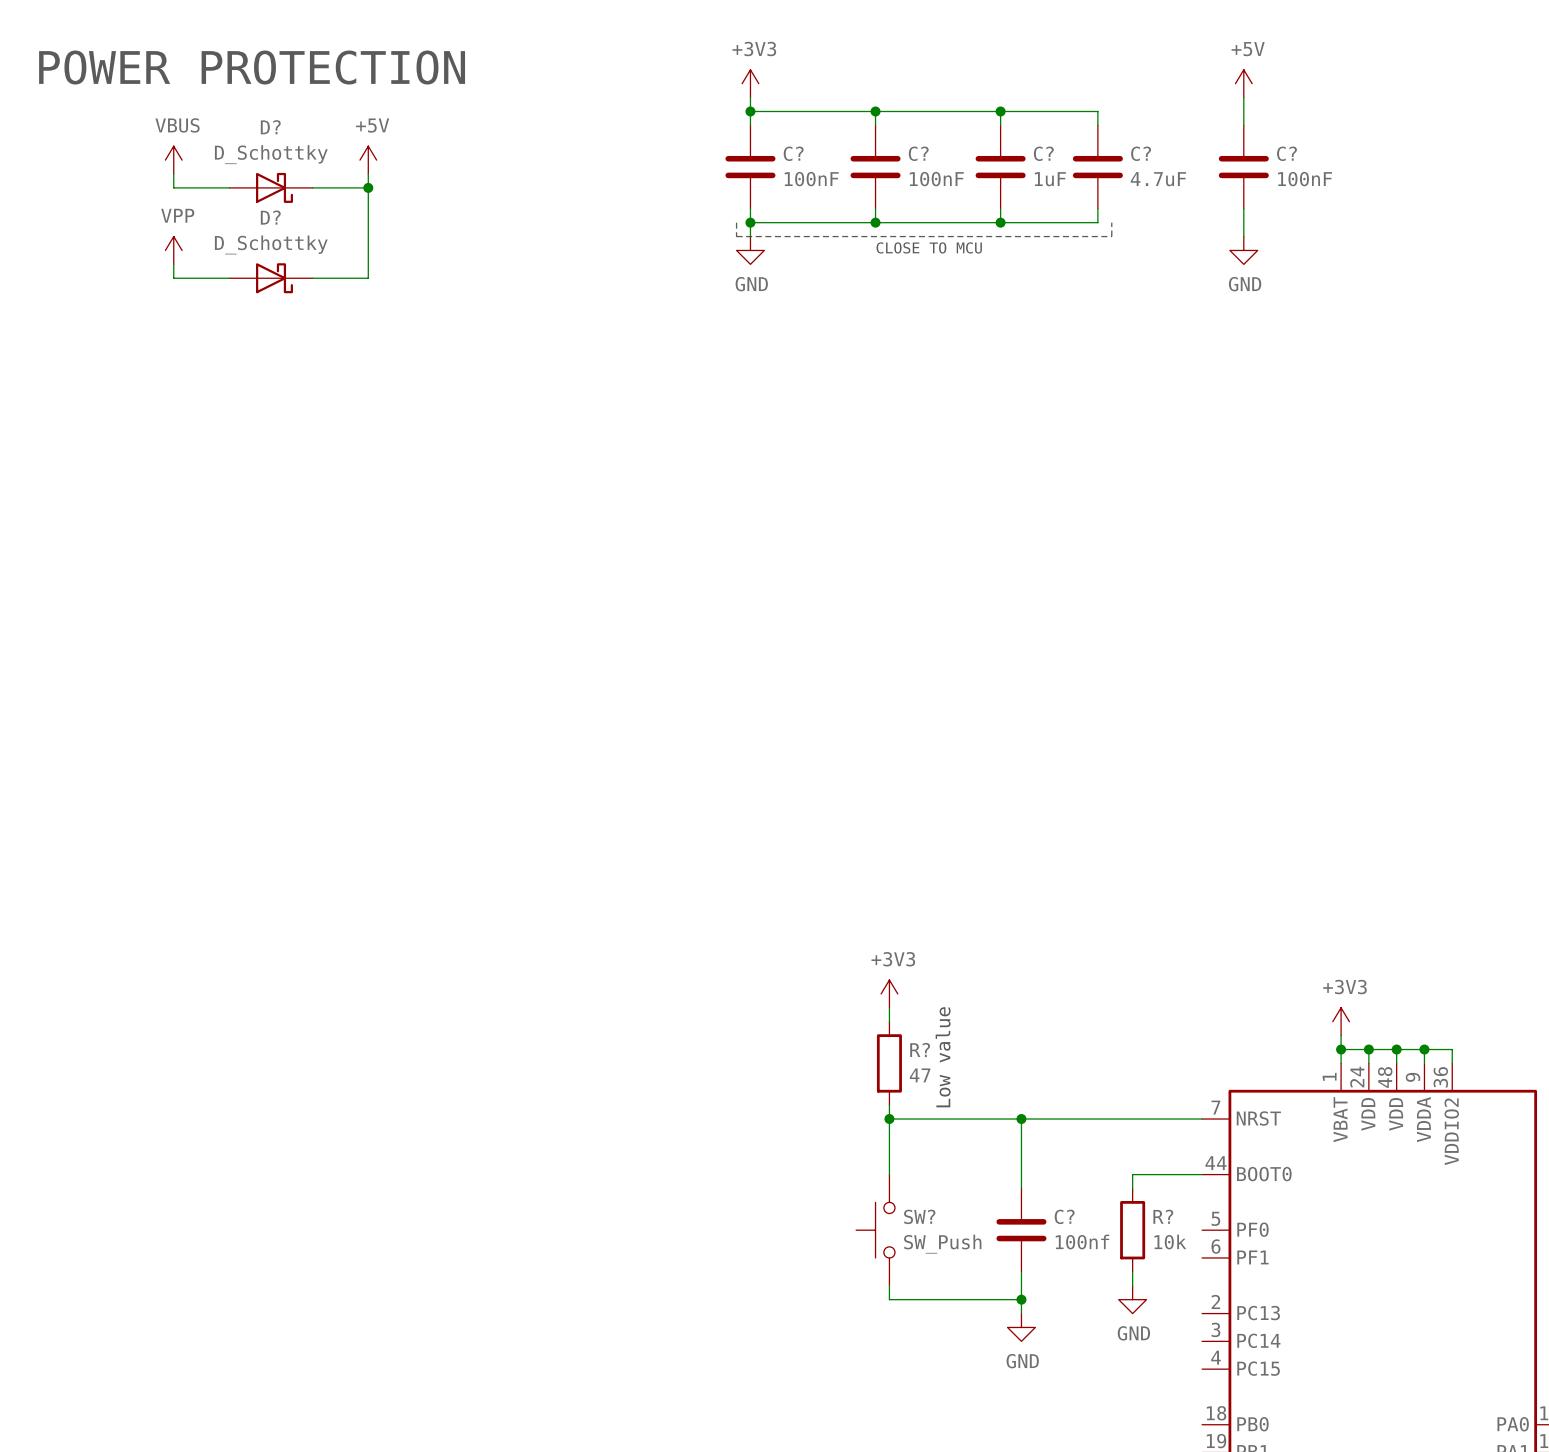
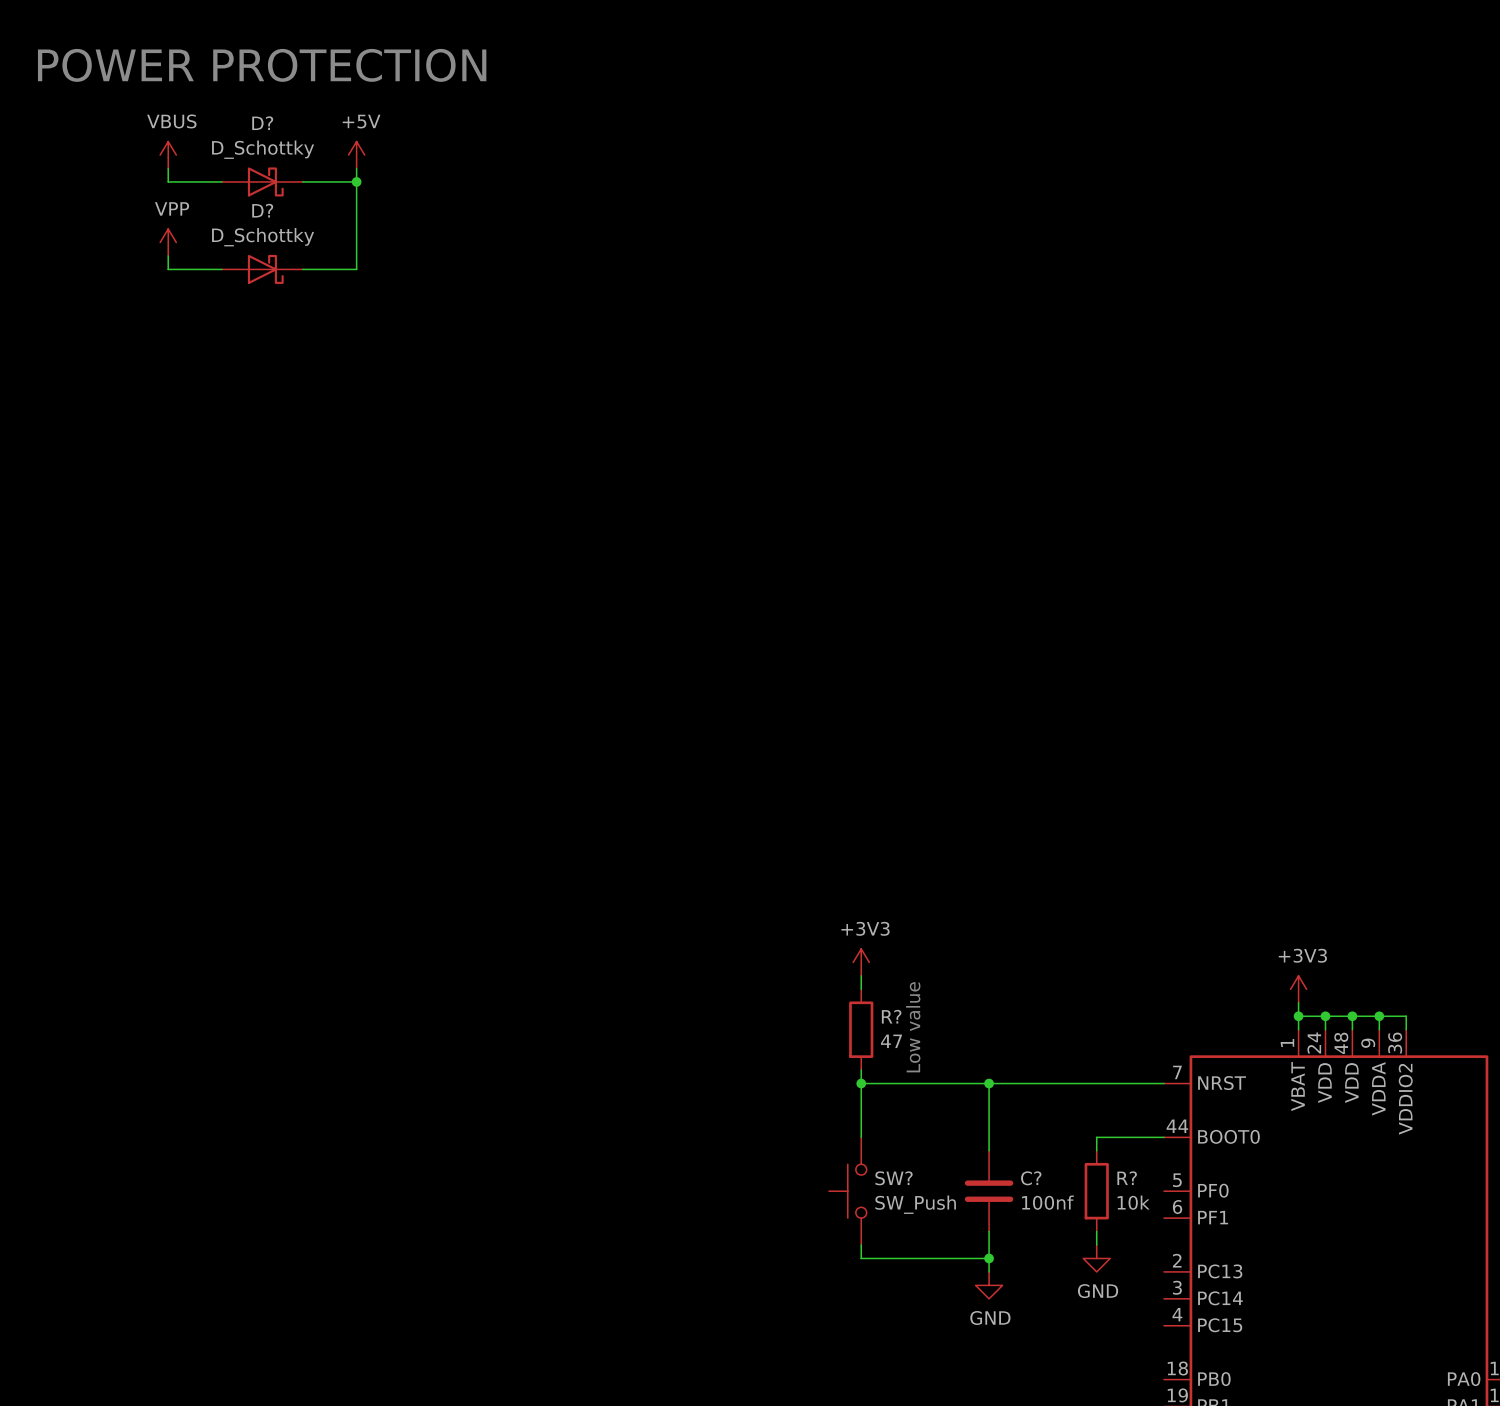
power symbol: +3V3 (750, 83) -> none
power symbol: +5V (1243, 83) -> none
wire: (750, 97) (750, 125) -> none
wire: (1243, 97) (1243, 125) -> none
wire: (750, 111) (1097, 111) (1097, 125) -> none
junction: (750, 111) -> none
wire: (875, 111) (875, 125) -> none
junction: (875, 111) -> none
wire: (1000, 111) (1000, 125) -> none
junction: (1000, 111) -> none
C?: 100nF (750, 167) -> none
C?: 100nF (875, 167) -> none
C?: 1uF (1000, 167) -> none
C?: 4.7uF (1097, 167) -> none
C?: 100nF (1243, 167) -> none
wire: (750, 208) (750, 236) -> none
wire: (875, 208) (875, 222) -> none
wire: (1000, 208) (1000, 222) -> none
wire: (1097, 208) (1097, 222) (750, 222) -> none
wire: (1243, 208) (1243, 236) -> none
line: (736, 222) (736, 236) (1111, 236) (1111, 222) -> none
junction: (750, 222) -> none
junction: (875, 222) -> none
junction: (1000, 222) -> none
text: CLOSE TO MCU (929, 247) -> none
power symbol: GND (750, 250) -> none
power symbol: GND (1243, 250) -> none

